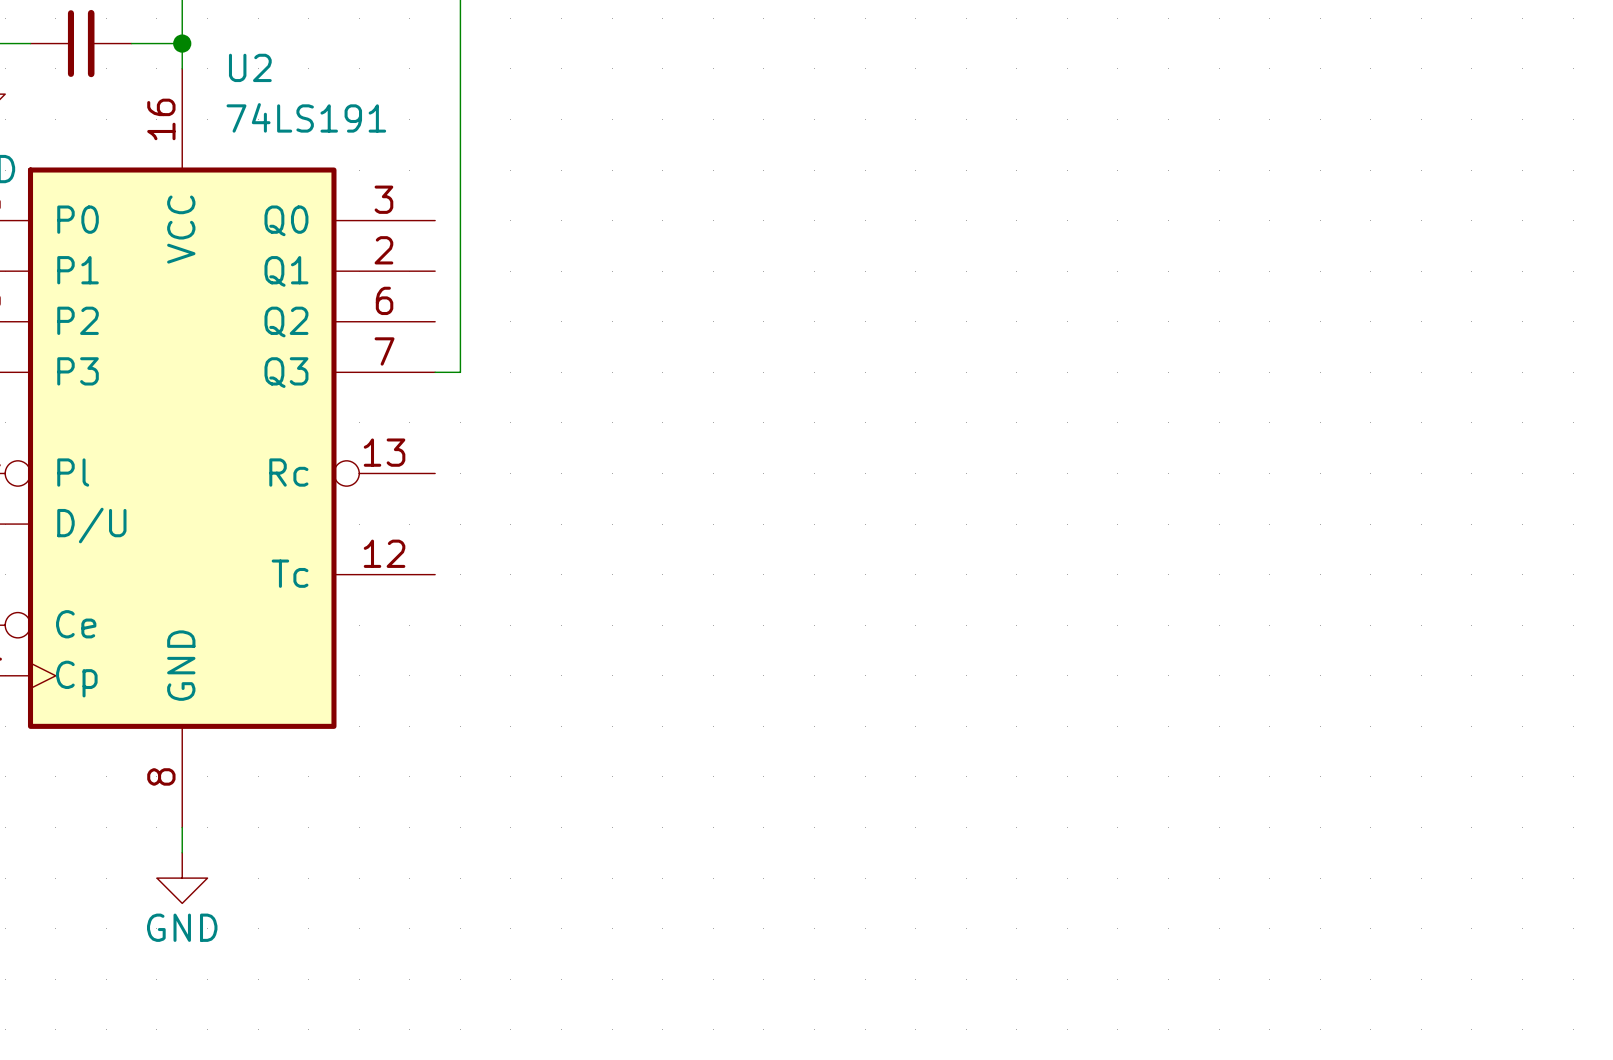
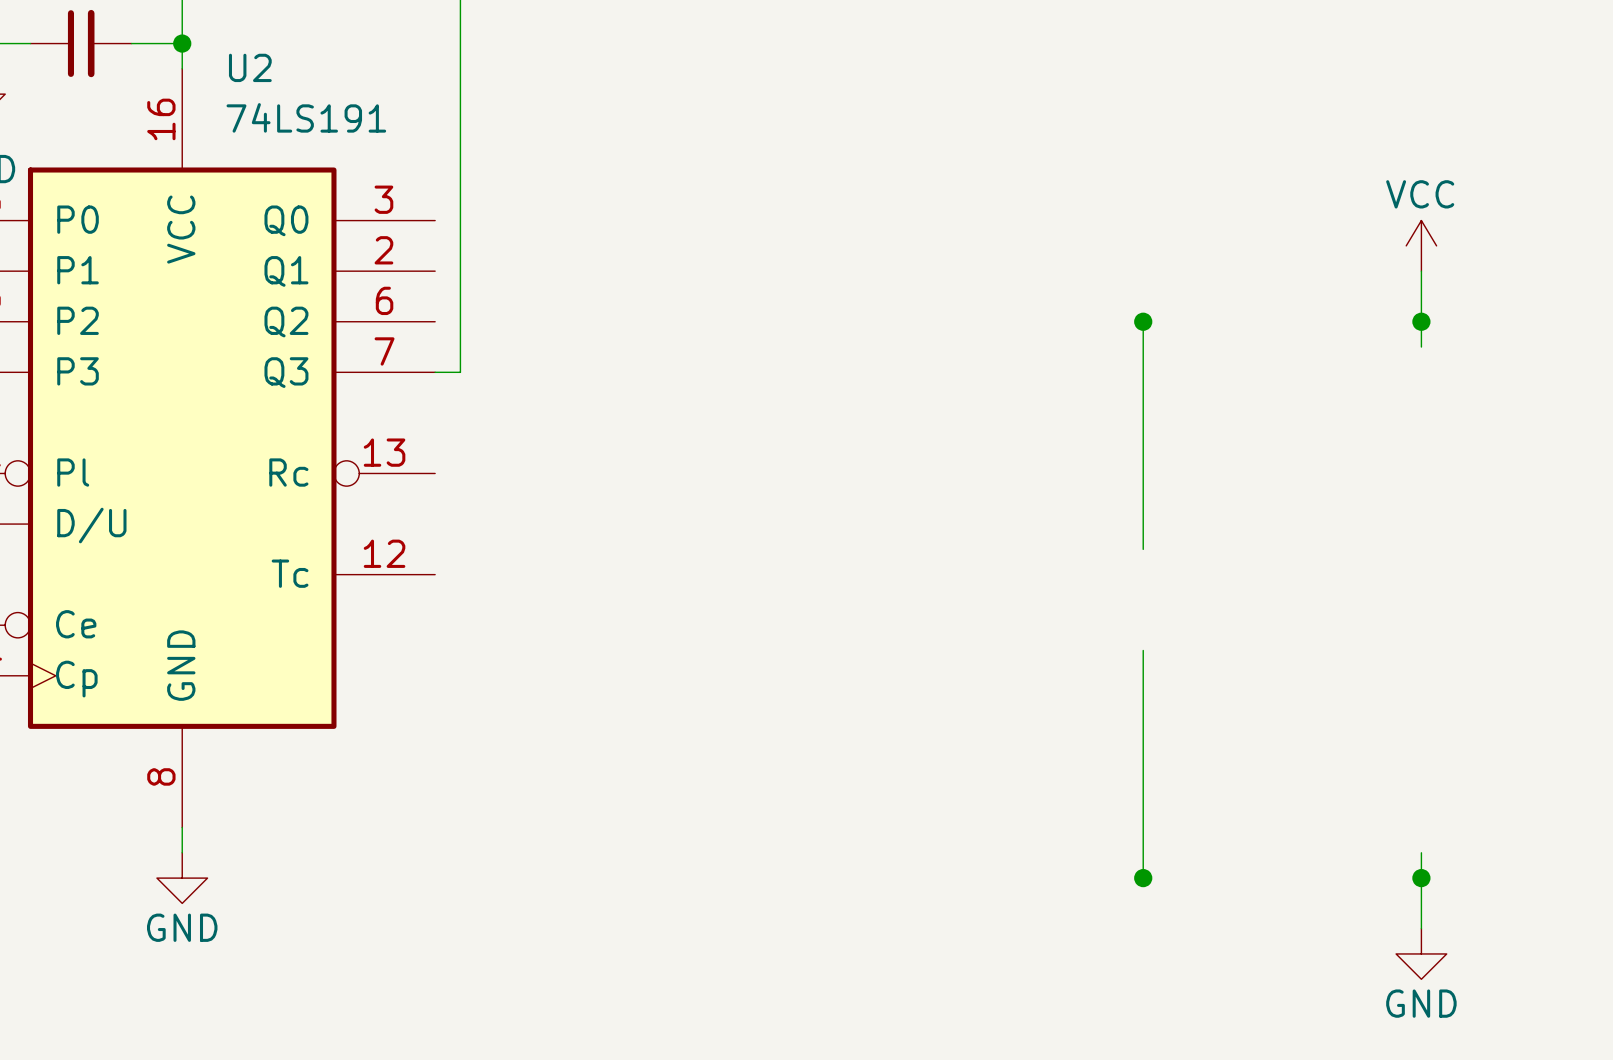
power symbol: none -> VCC (1421, 245)
wire: none -> (1421, 271) (1421, 347)
wire: none -> (1143, 321) (1143, 549)
junction: none -> (1143, 321)
junction: none -> (1421, 321)
wire: none -> (1143, 650) (1143, 878)
wire: none -> (1421, 852) (1421, 928)
junction: none -> (1143, 878)
junction: none -> (1421, 878)
power symbol: none -> GND (1421, 953)

